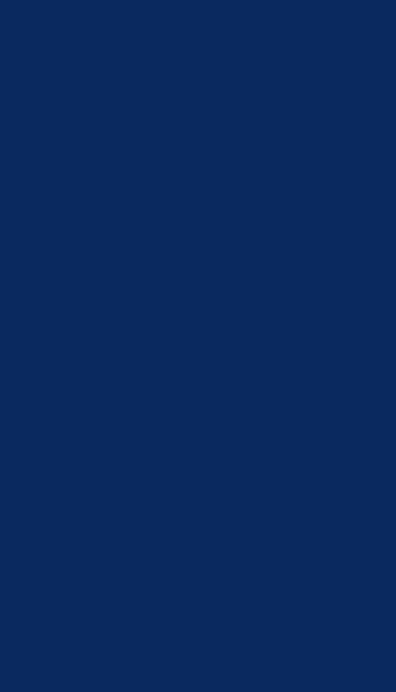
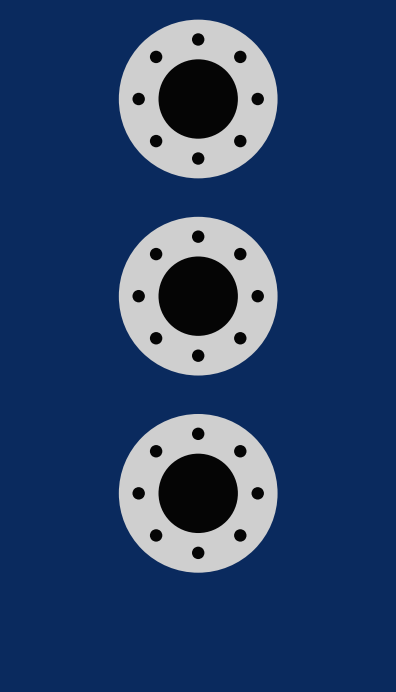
part: none -> (198, 99)
part: none -> (198, 296)
part: none -> (198, 493)

